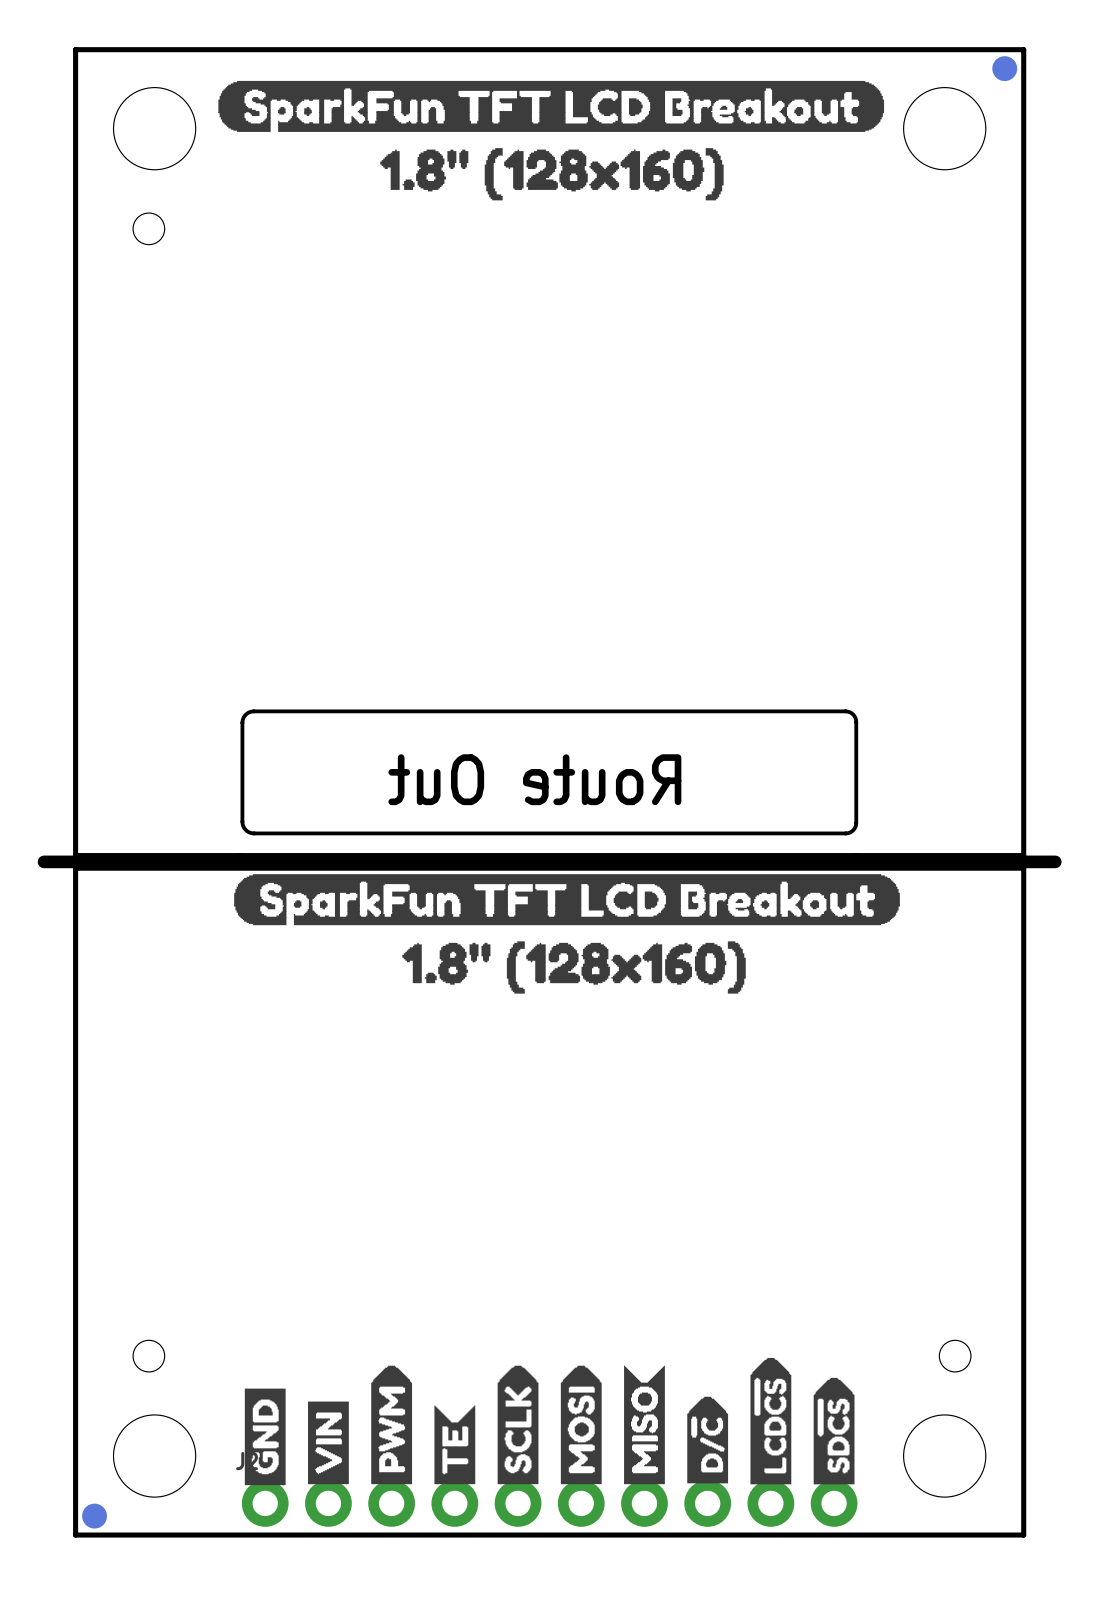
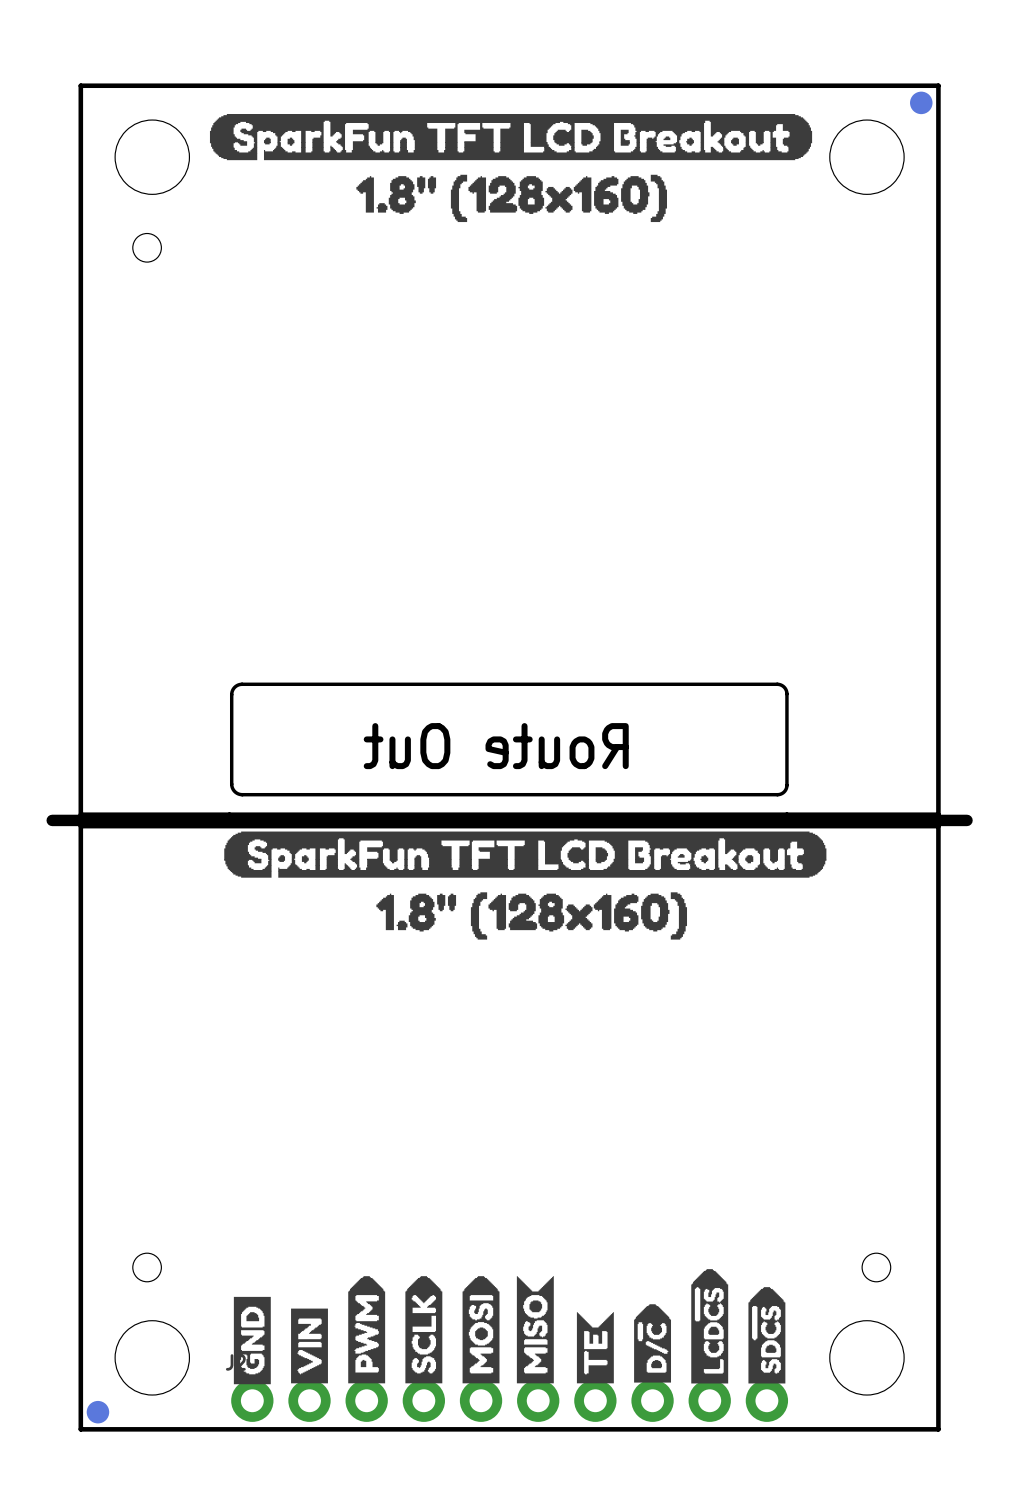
drawing position: (518, 1424) -> (423, 1329)
drawing position: (581, 1424) -> (481, 1329)
drawing position: (644, 1424) -> (535, 1329)
drawing position: (454, 1444) -> (595, 1347)

